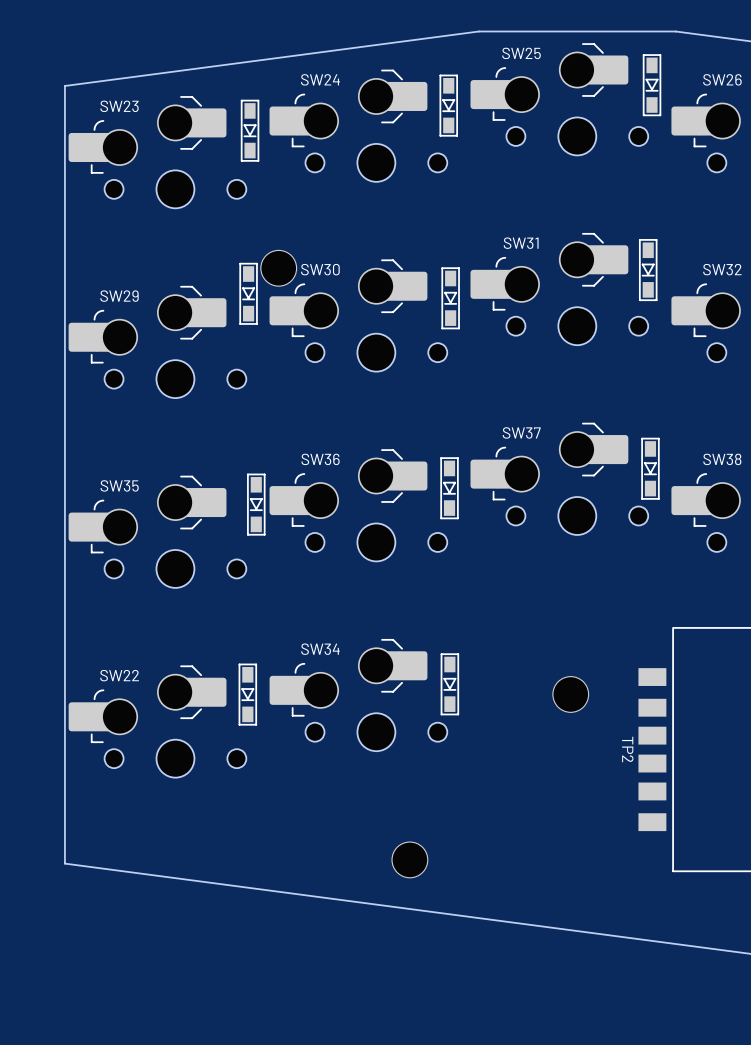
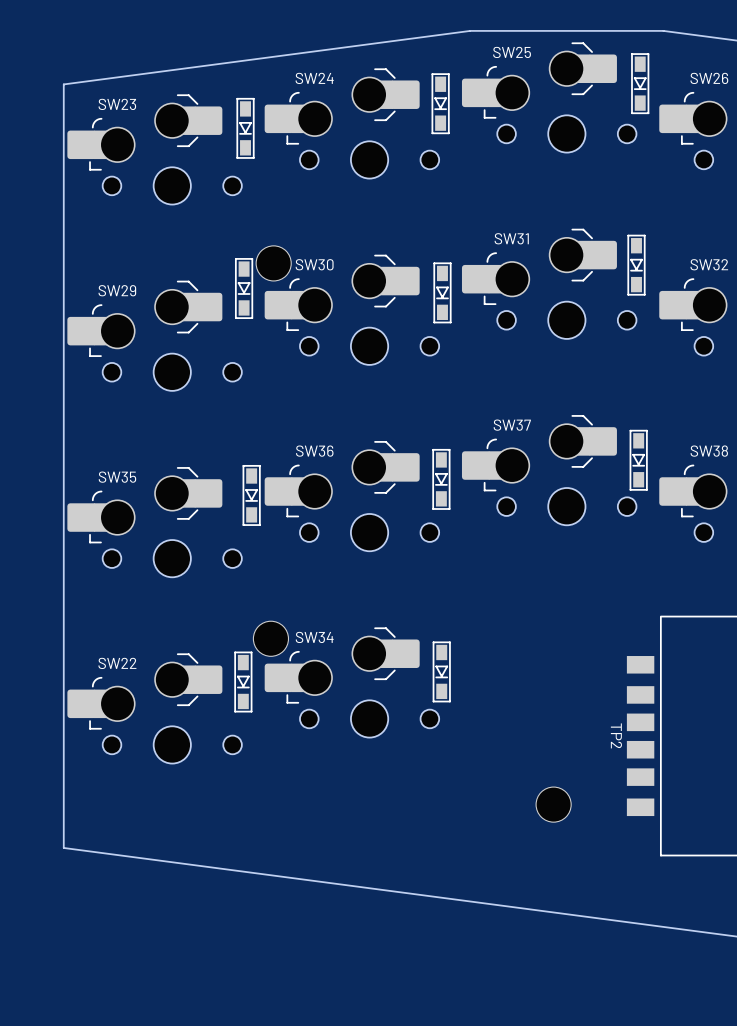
part: none -> (270, 638)
part: (570, 694) -> none
part: none -> (553, 804)
part: (409, 859) -> none

